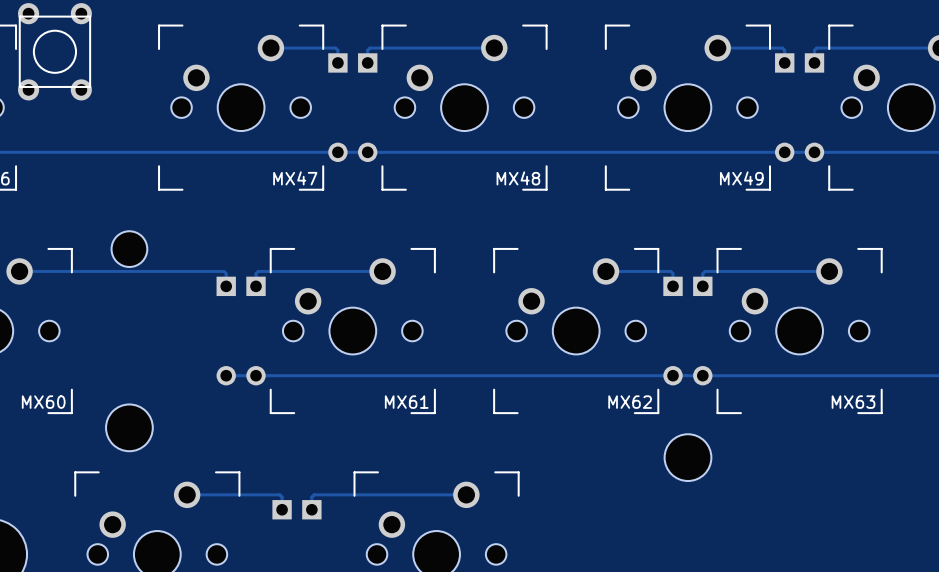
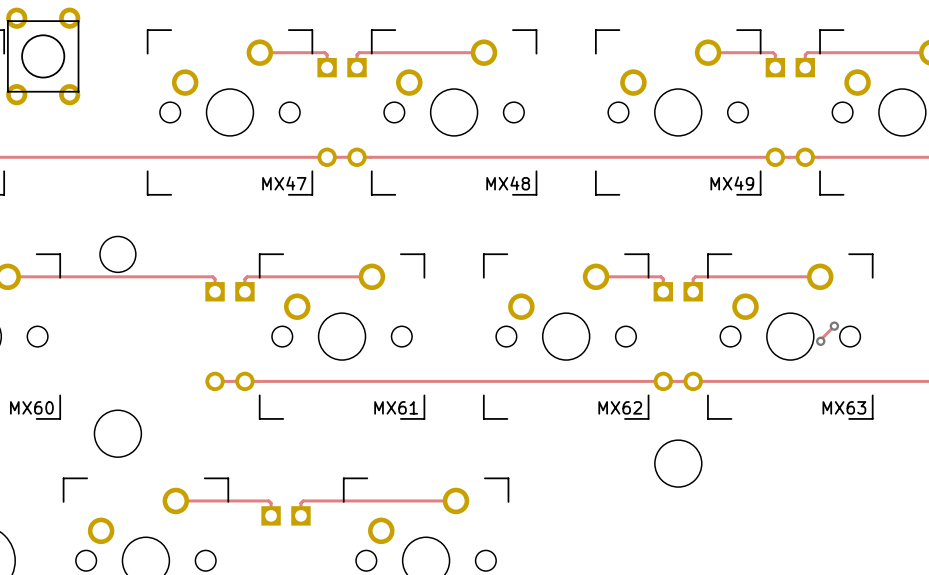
track: none -> (834, 326) (820, 341)
via: none -> (834, 326)
via: none -> (820, 341)

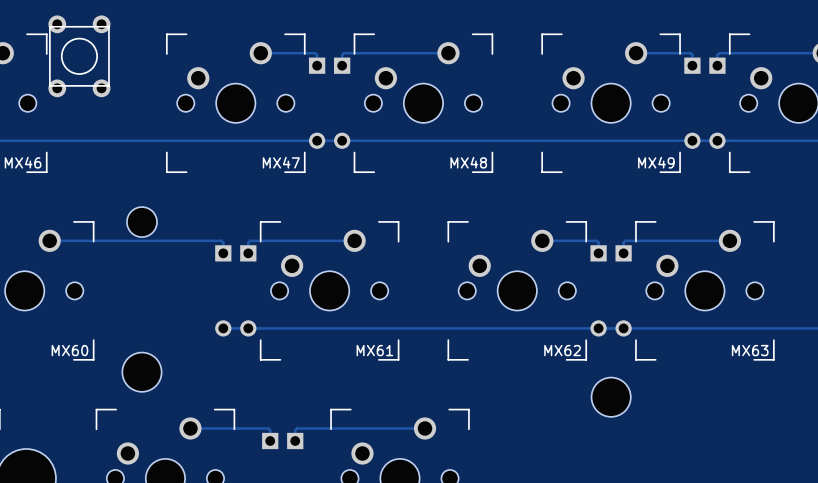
track: (834, 326) (820, 341) -> none
via: (834, 326) -> none
via: (820, 341) -> none

